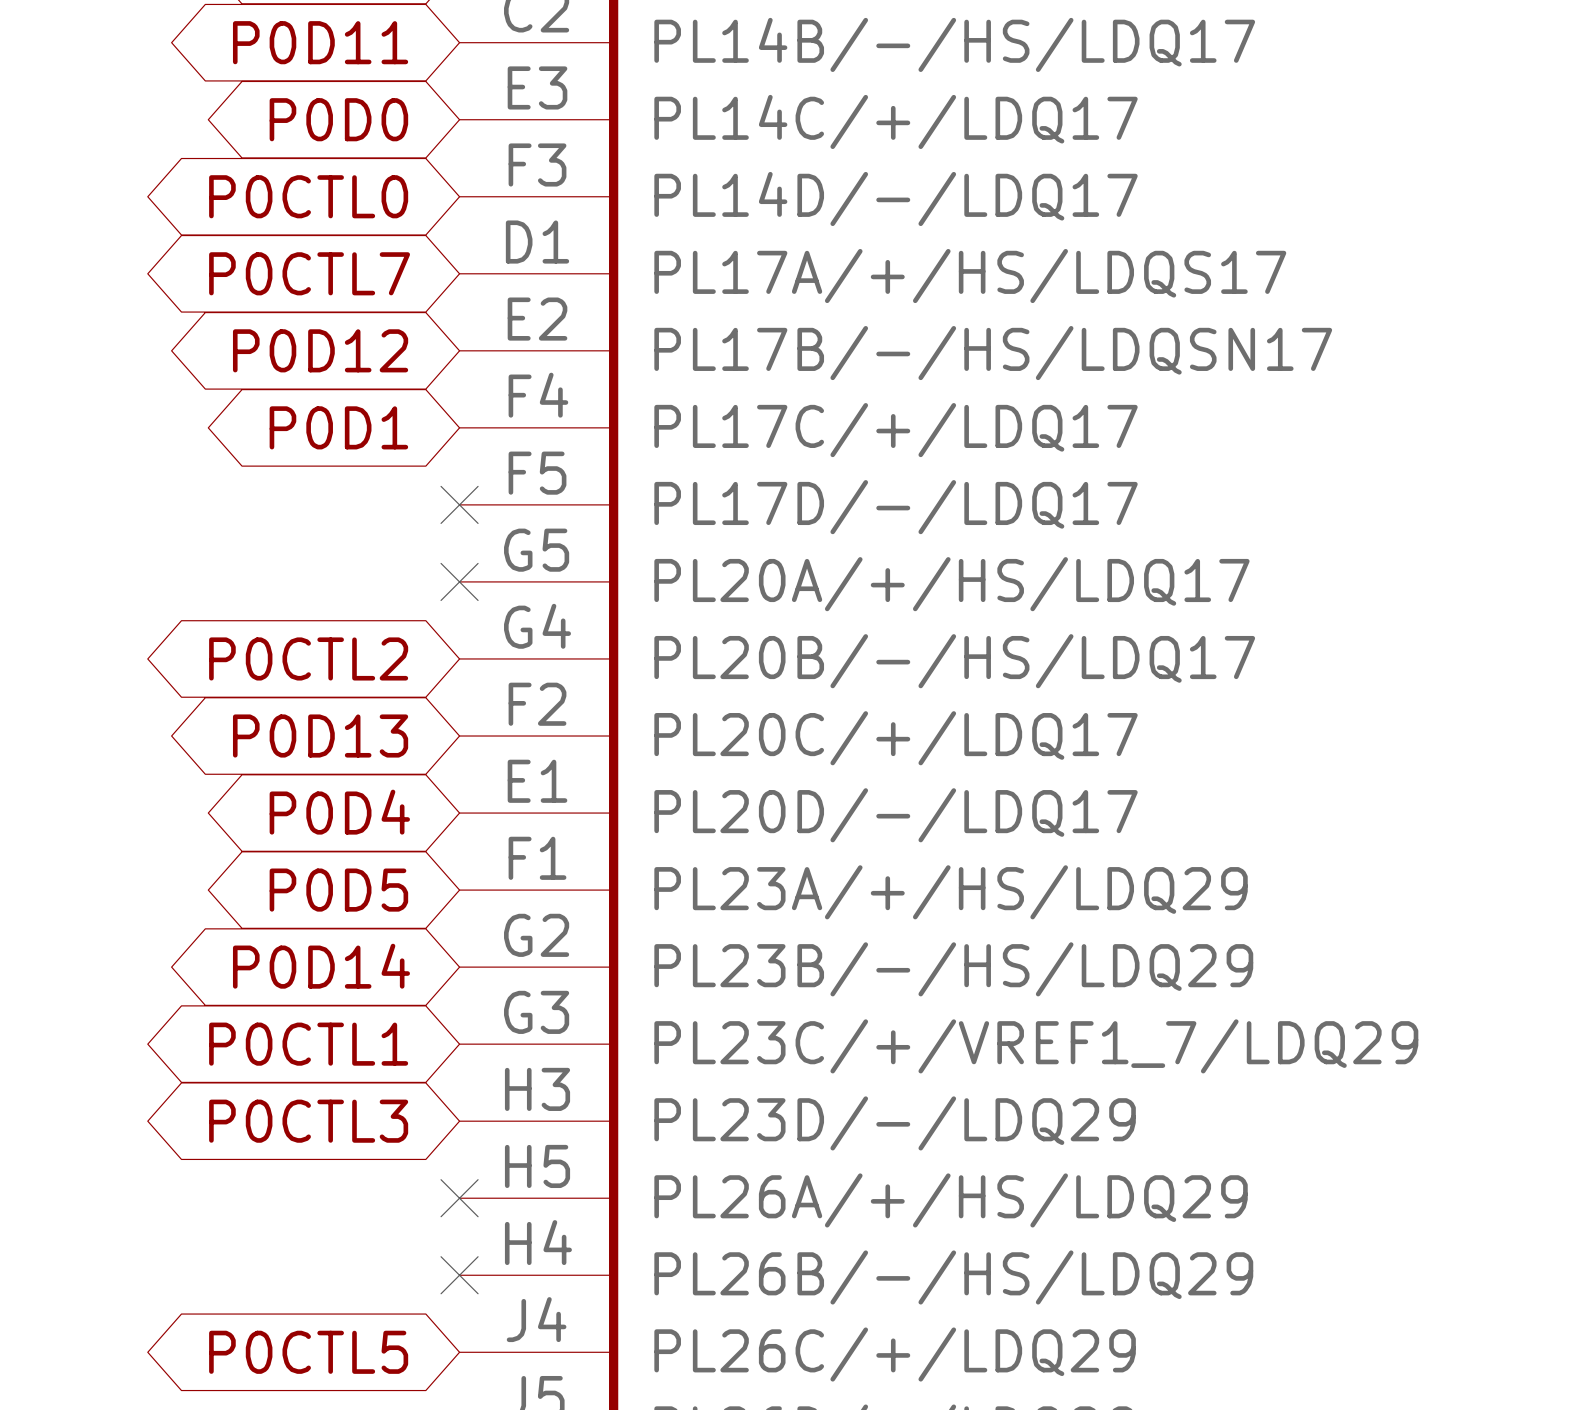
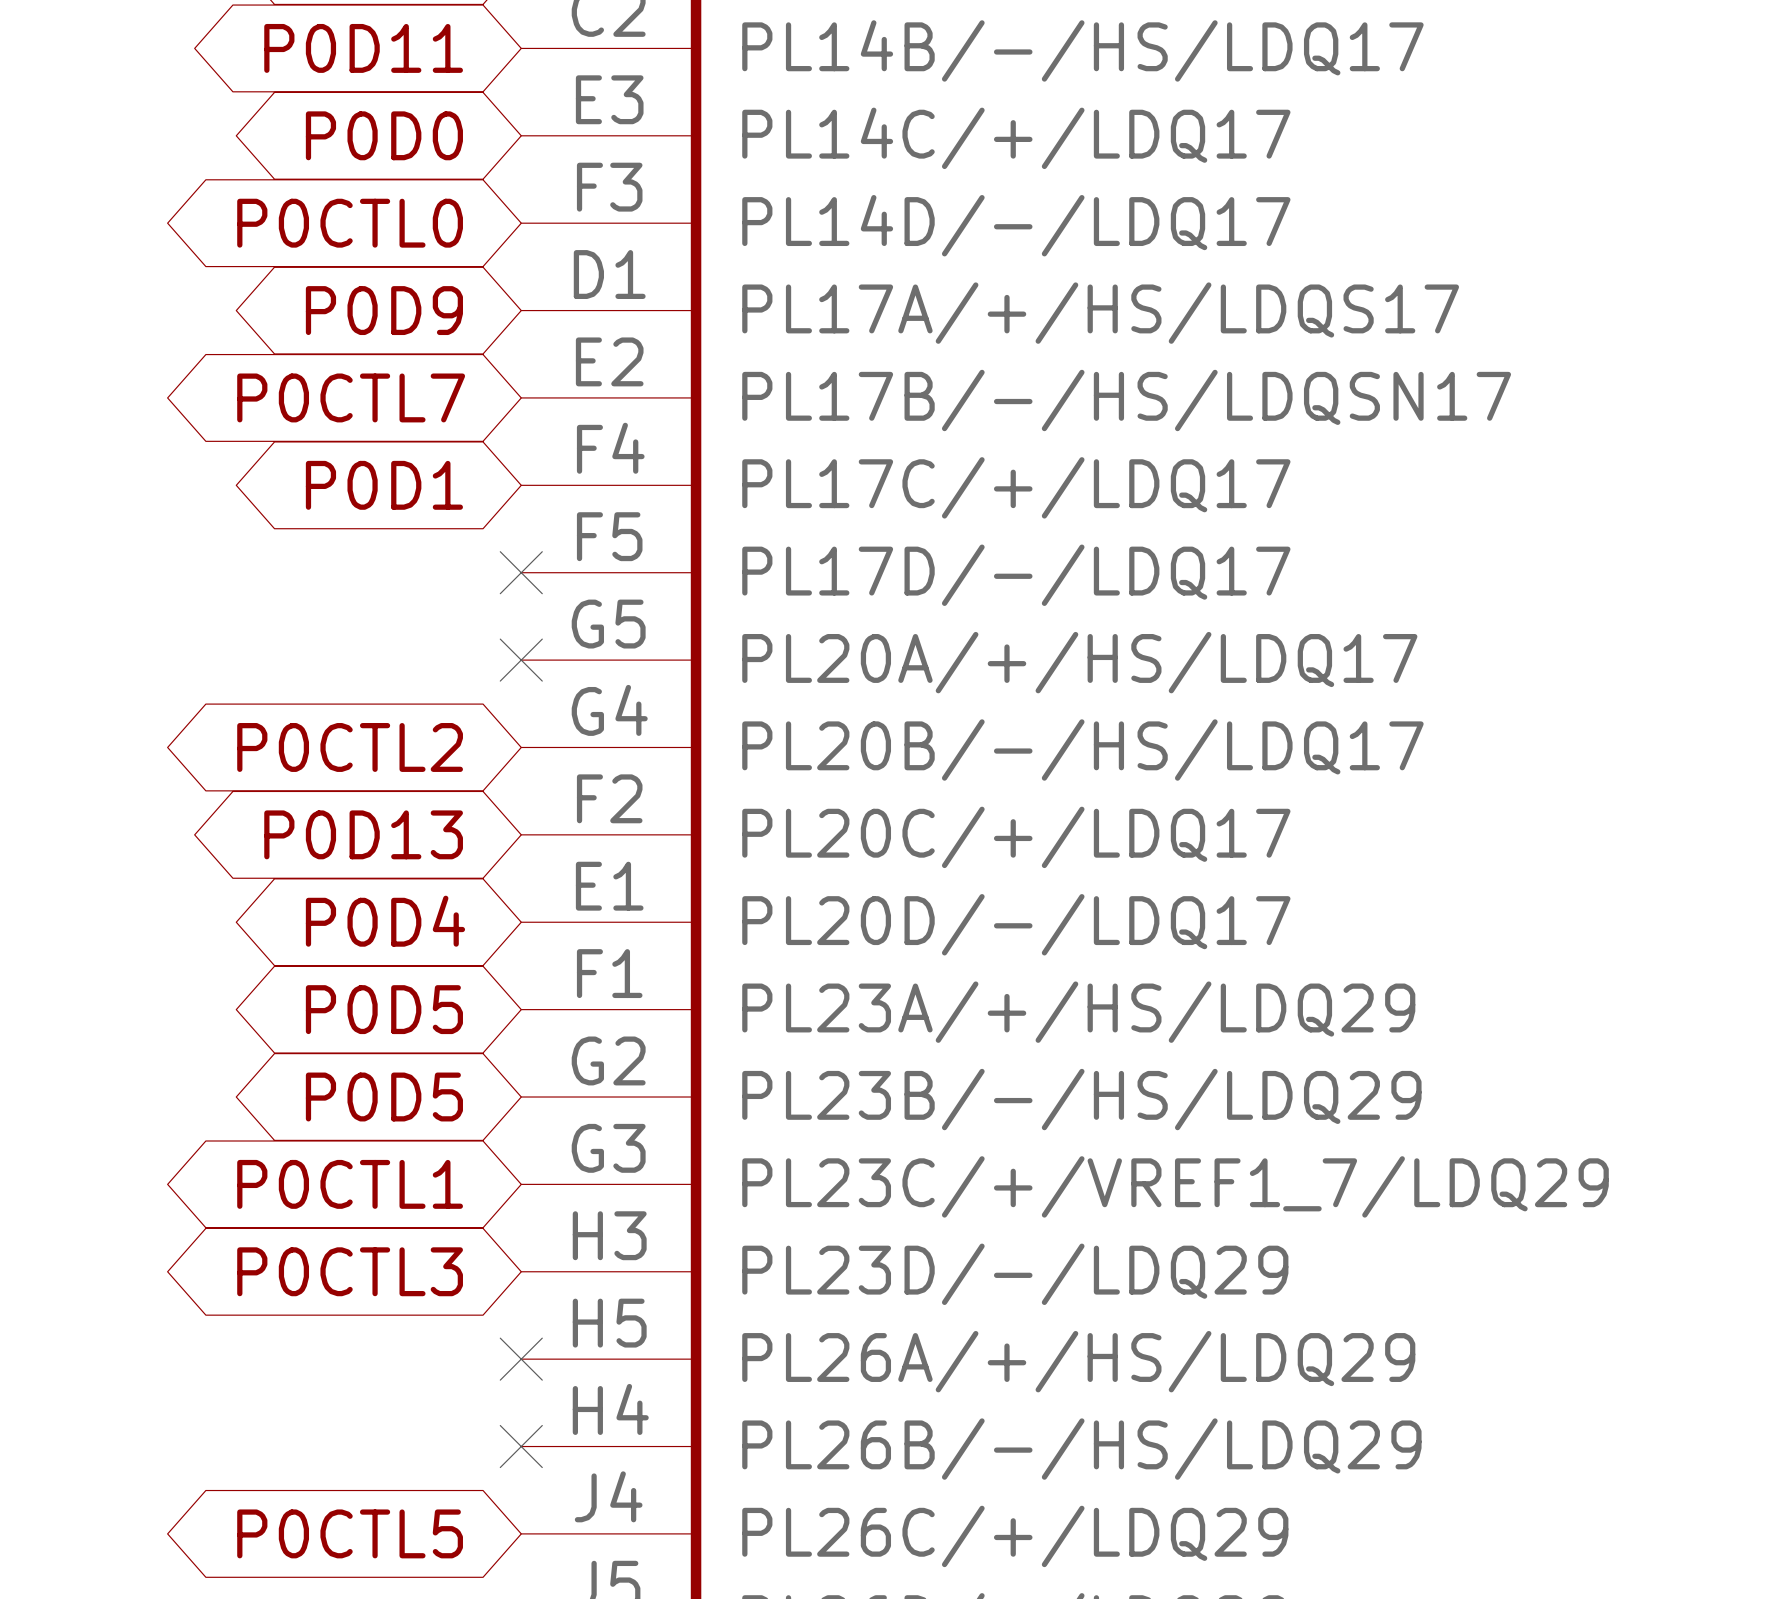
global label: P0CTL7 (309, 273) -> P0D9 (384, 310)
global label: P0D12 (320, 350) -> P0CTL7 (351, 397)
global label: P0D14 (321, 966) -> P0D5 (384, 1097)

